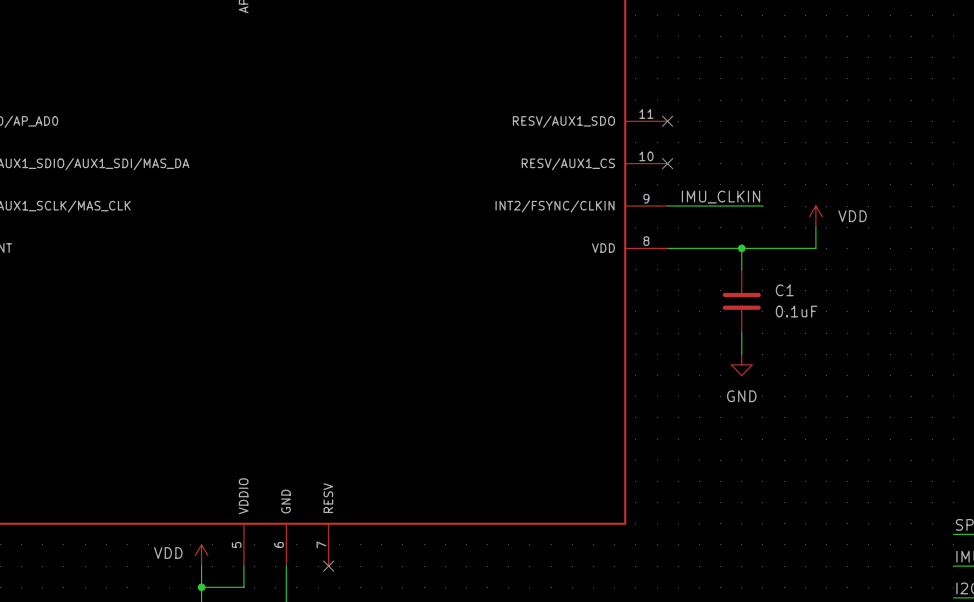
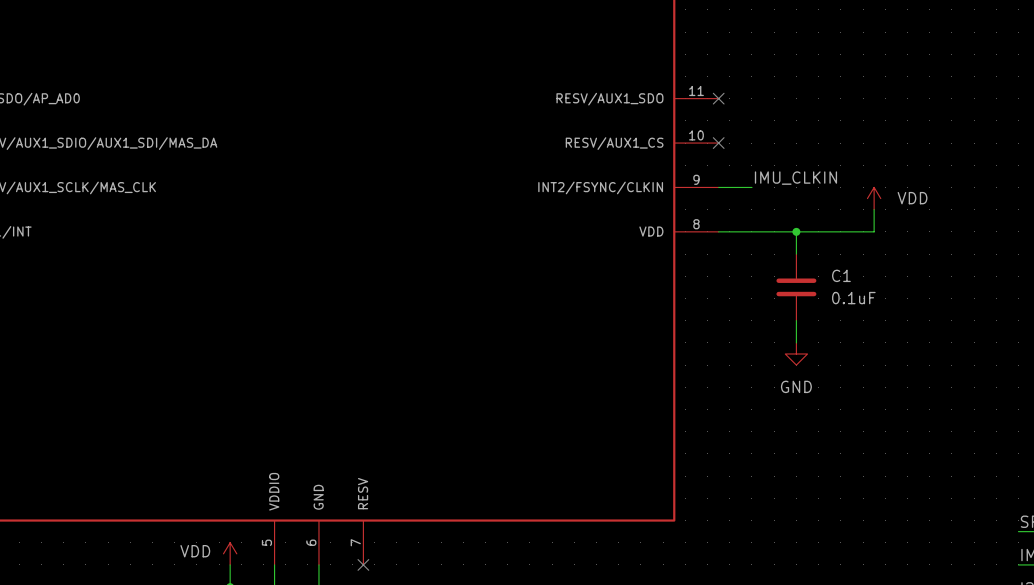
label position: IMU_CLKIN (721, 197) -> IMU_CLKIN (795, 178)
wire: (699, 206) (762, 206) -> none

